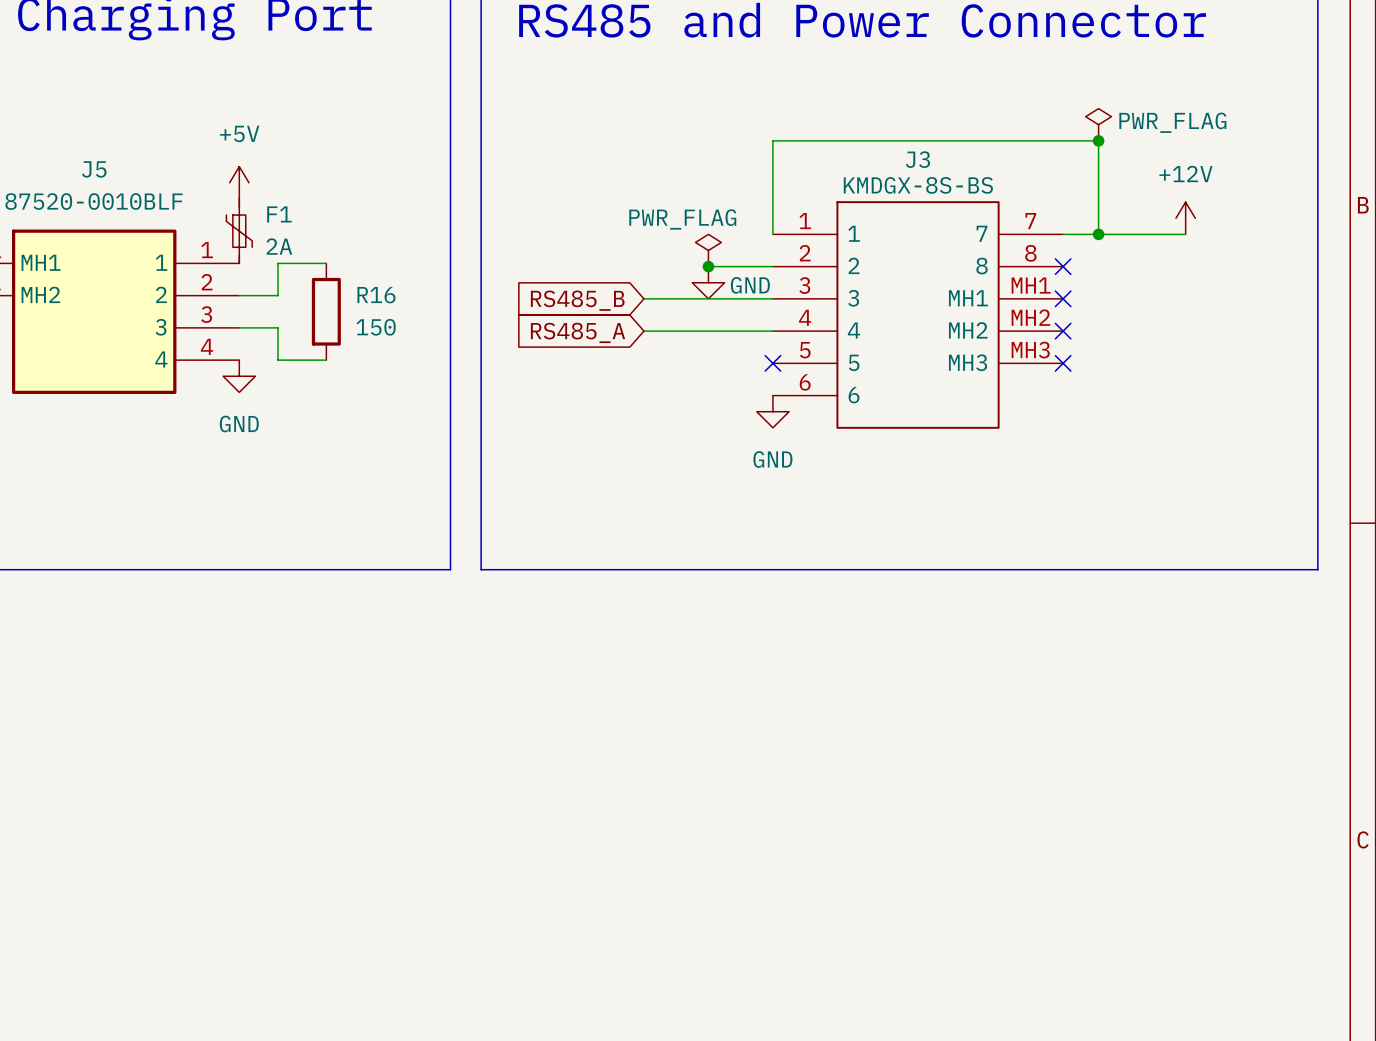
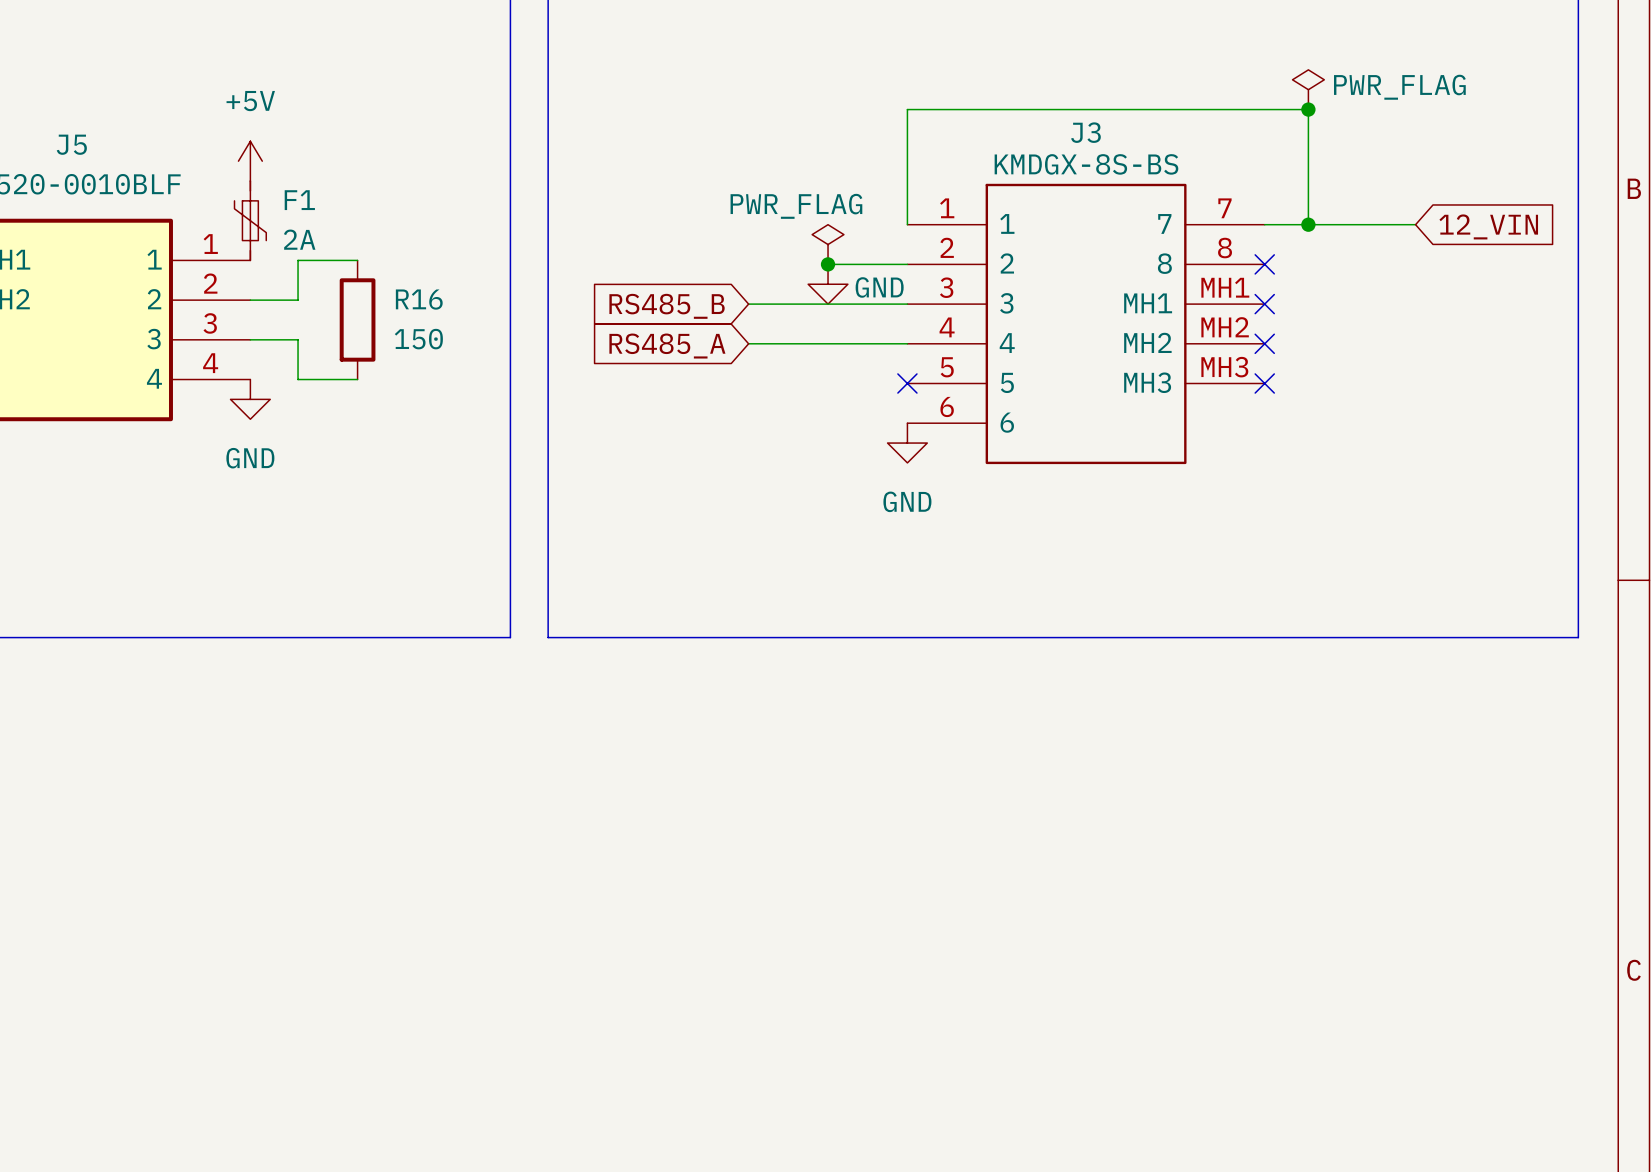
power symbol: +12V (1185, 218) -> none
global label: none -> 12_VIN (1488, 226)

